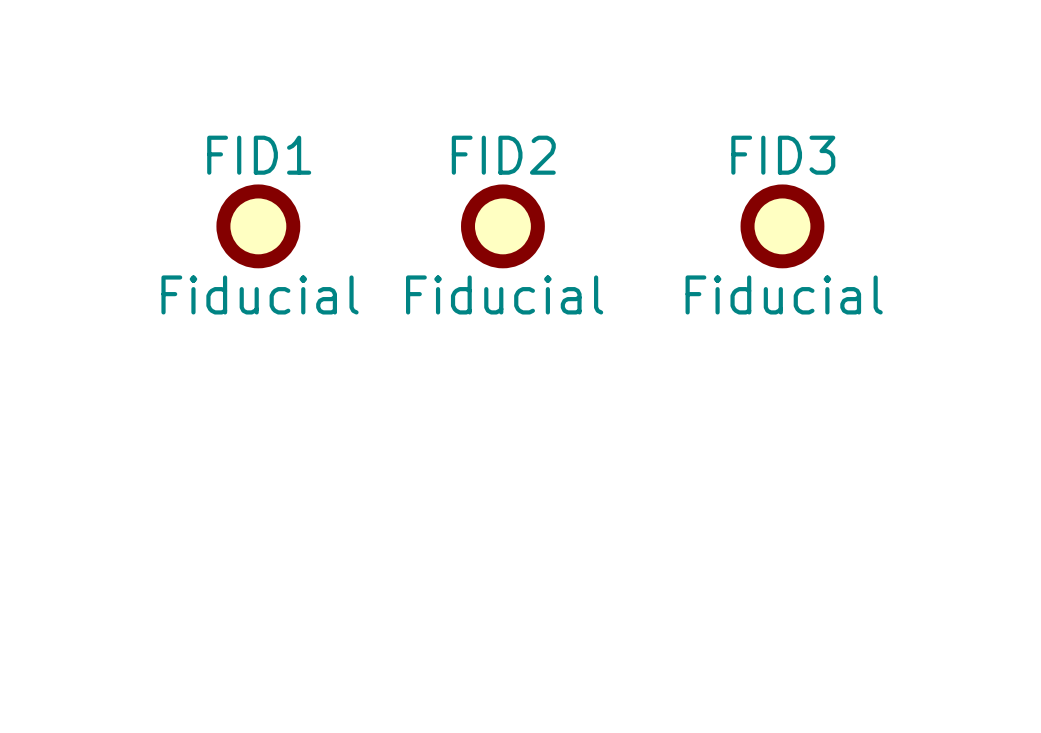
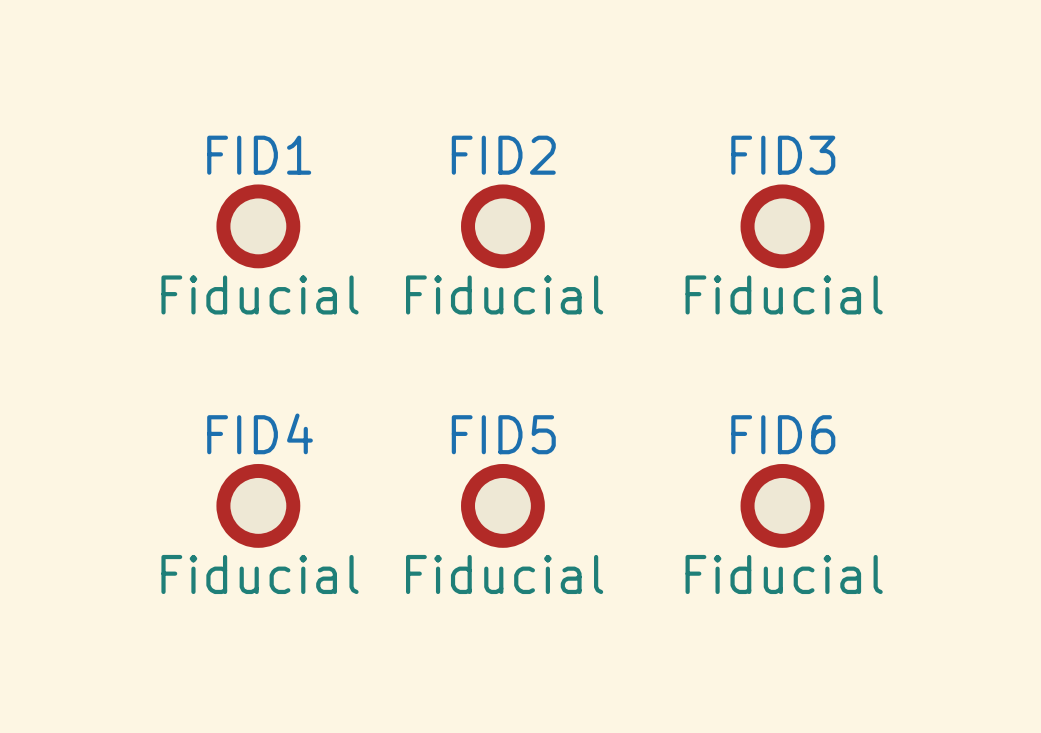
FID4: none -> Fiducial (258, 505)
FID5: none -> Fiducial (502, 505)
FID6: none -> Fiducial (782, 505)

